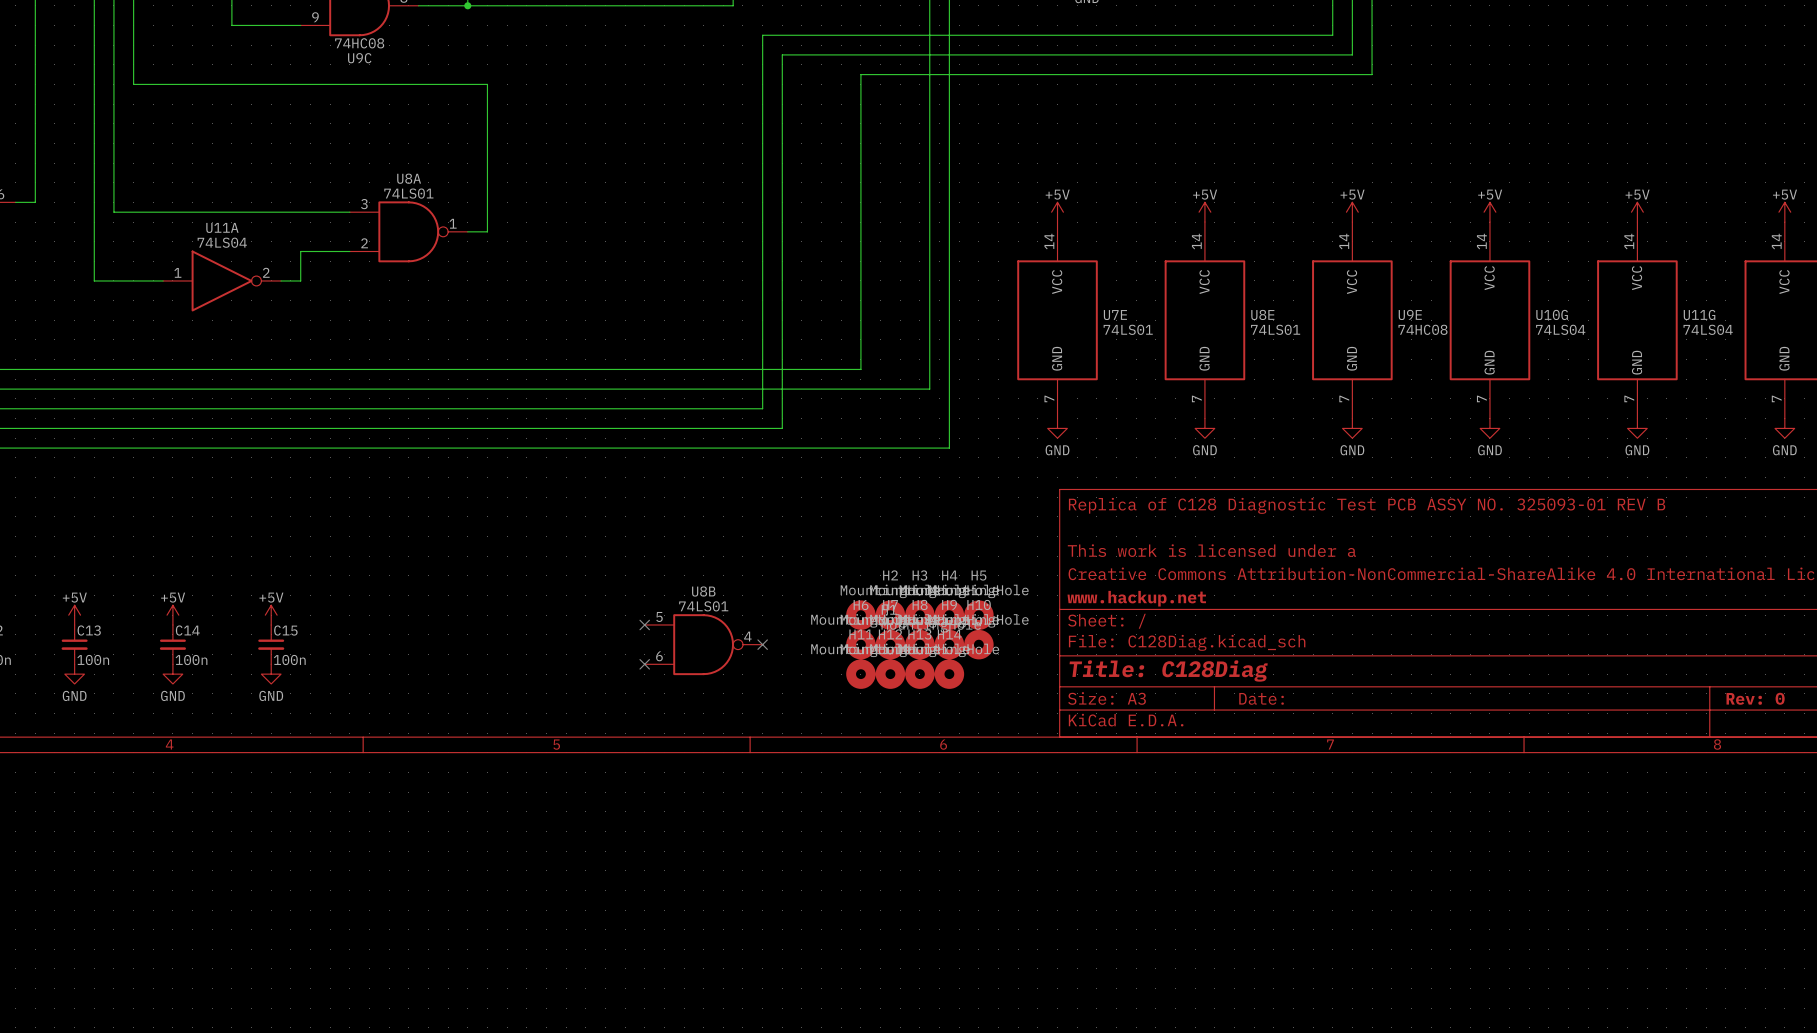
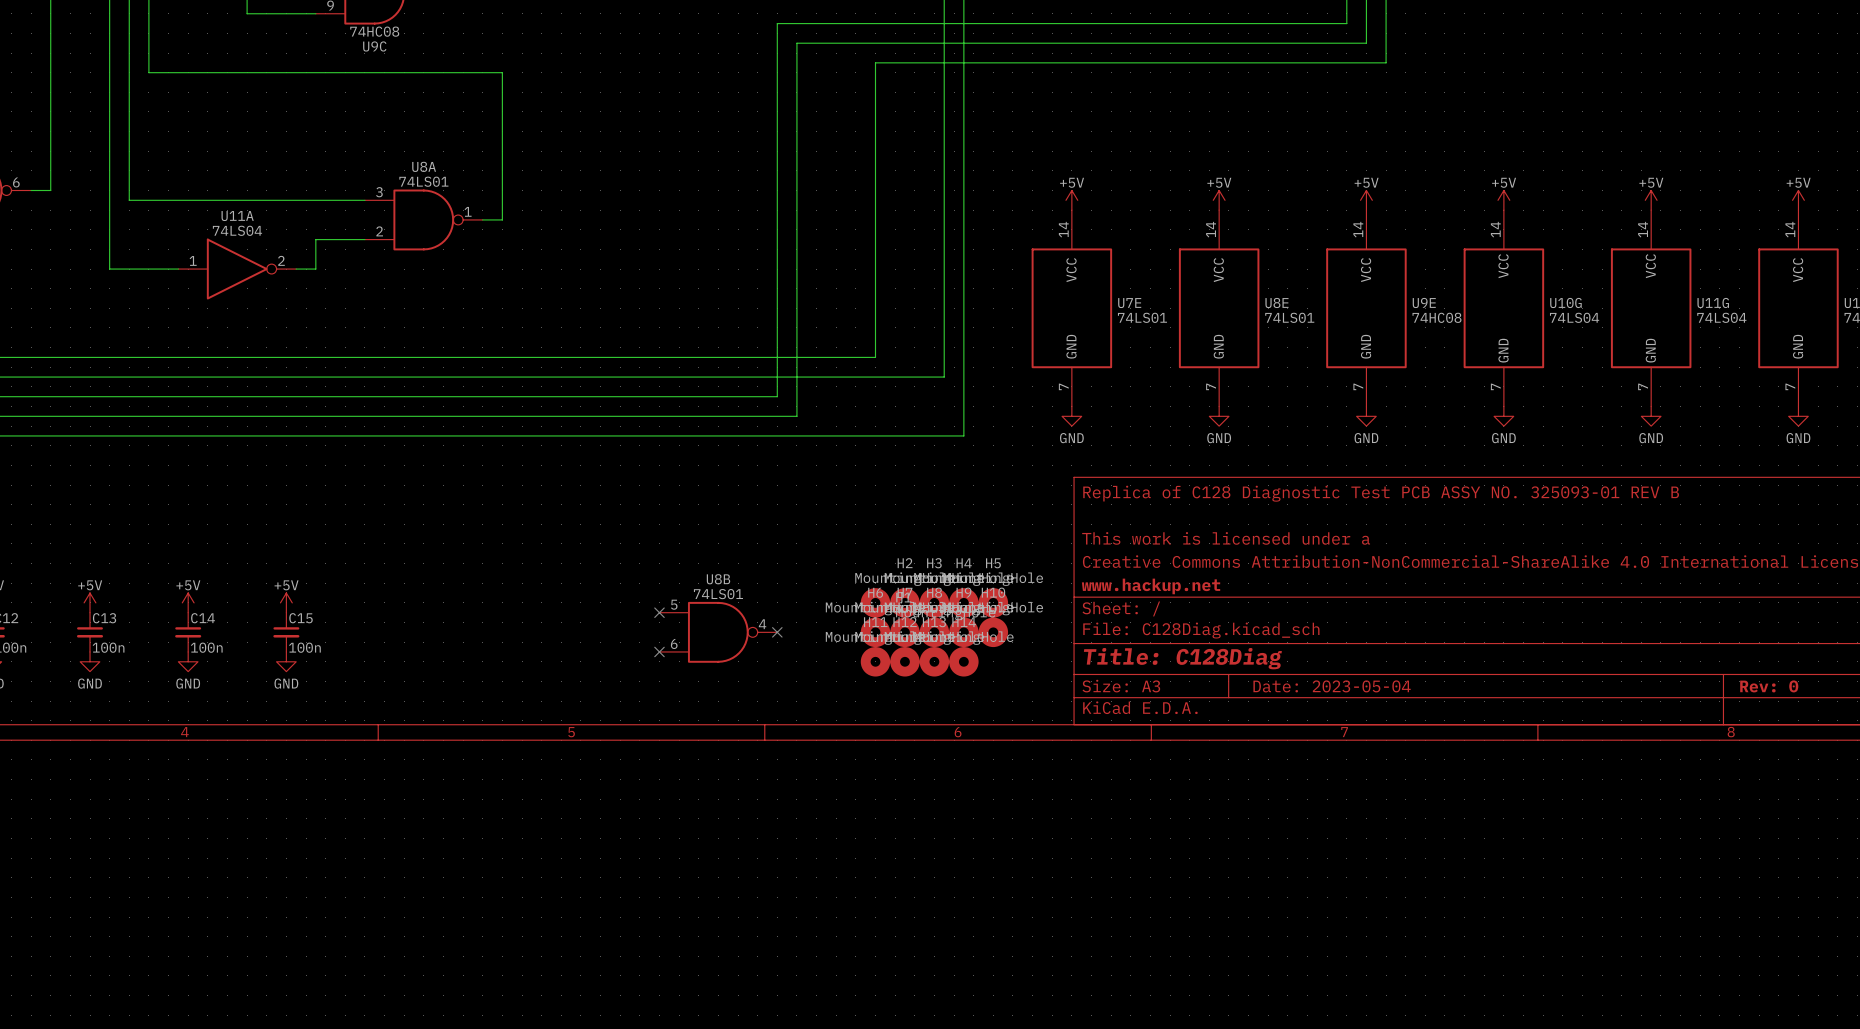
title block: Date: (1261, 698) -> Date: 2023-05-04 (1332, 686)

